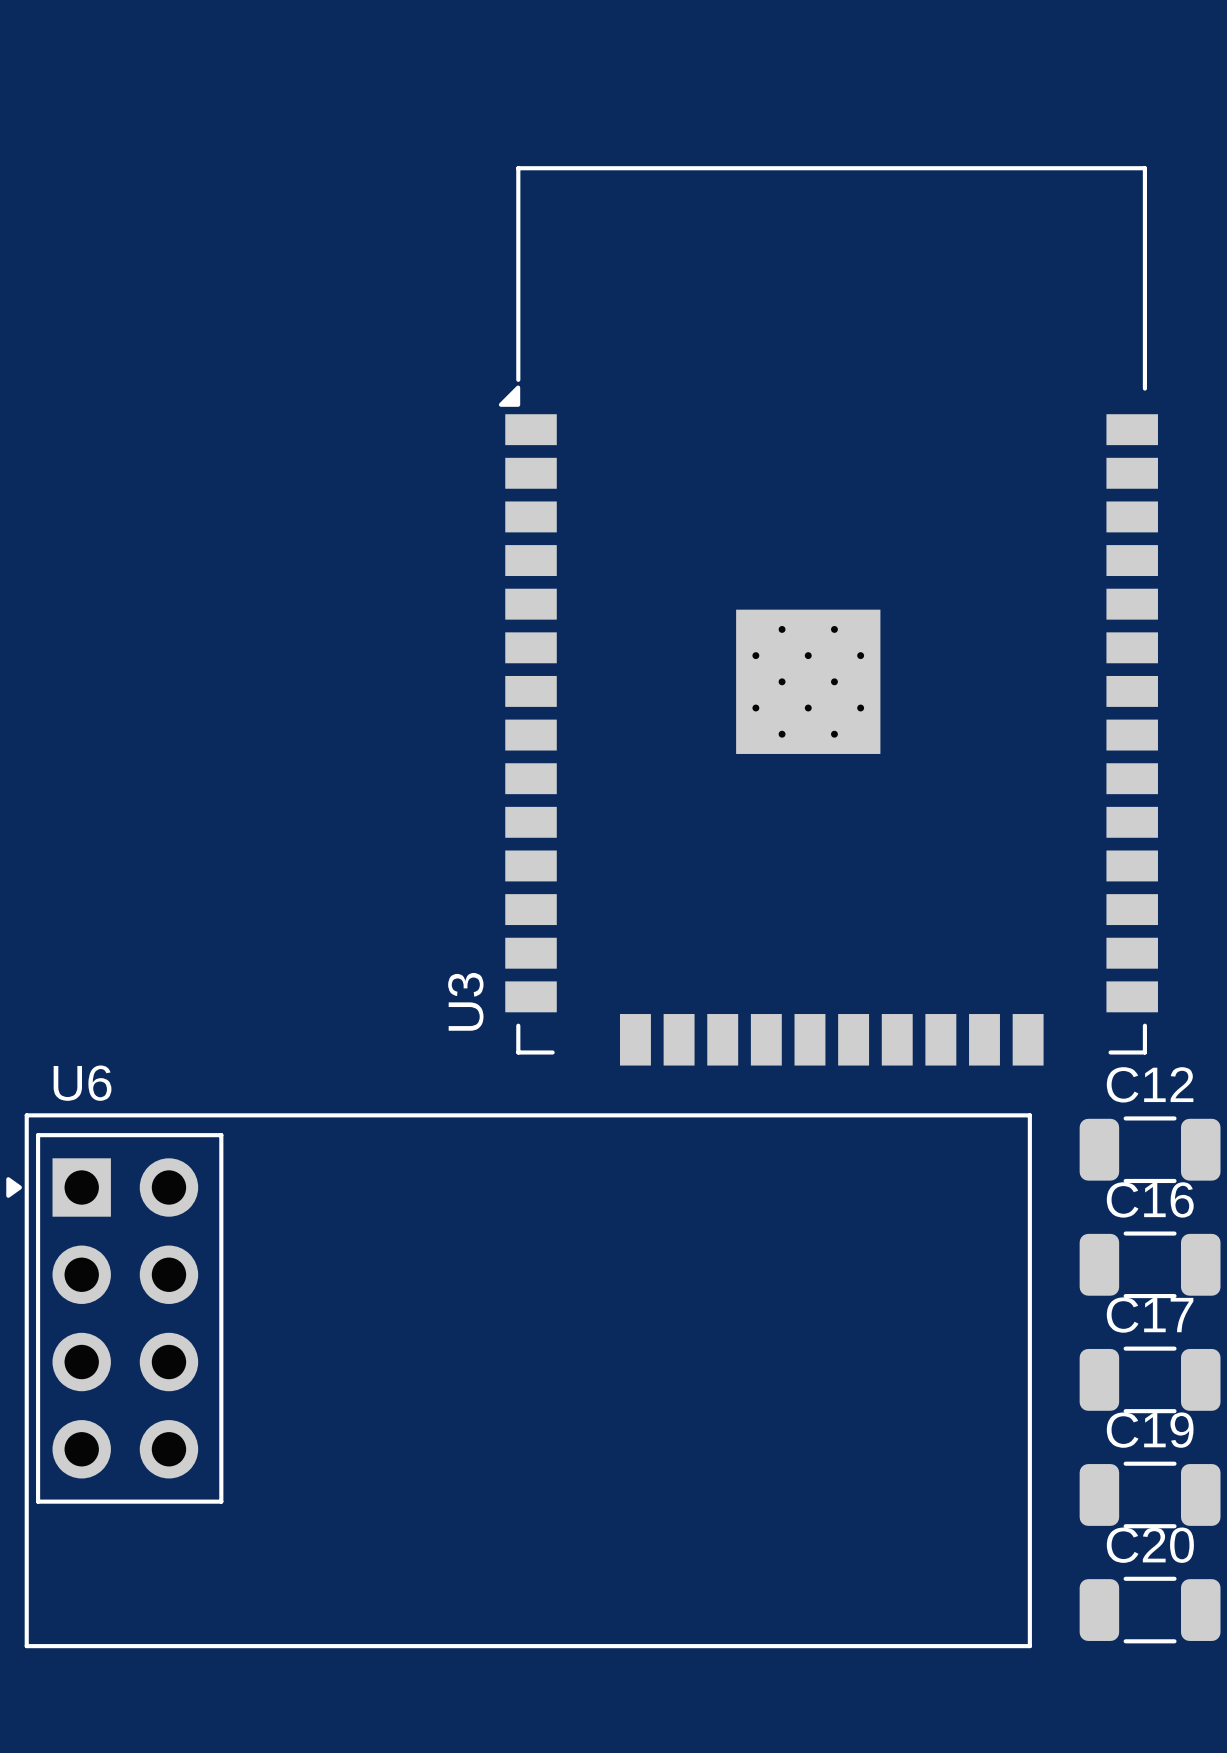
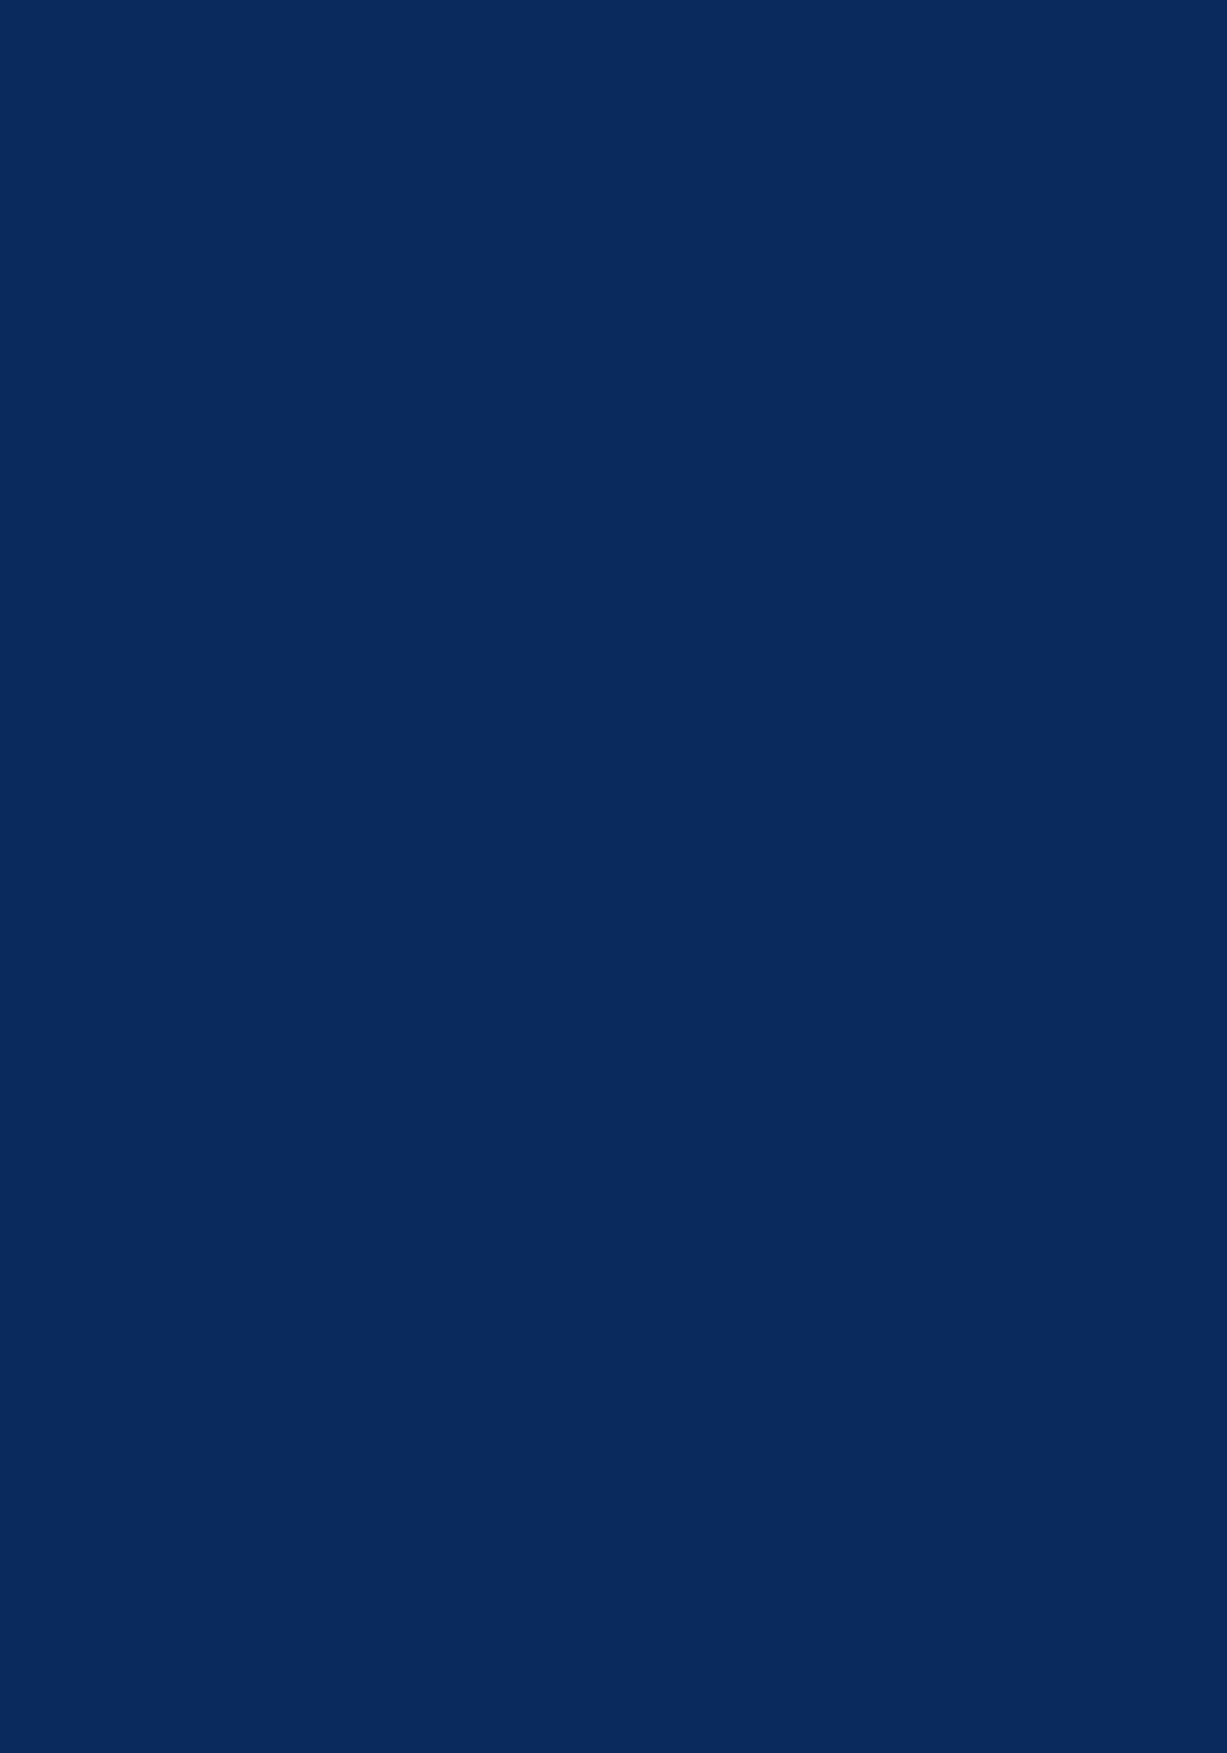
U3: (828, 615) -> none
C12: (1150, 1149) -> none
C16: (1150, 1264) -> none
C17: (1150, 1379) -> none
U6: (519, 1380) -> none
C19: (1150, 1494) -> none
C20: (1150, 1610) -> none

